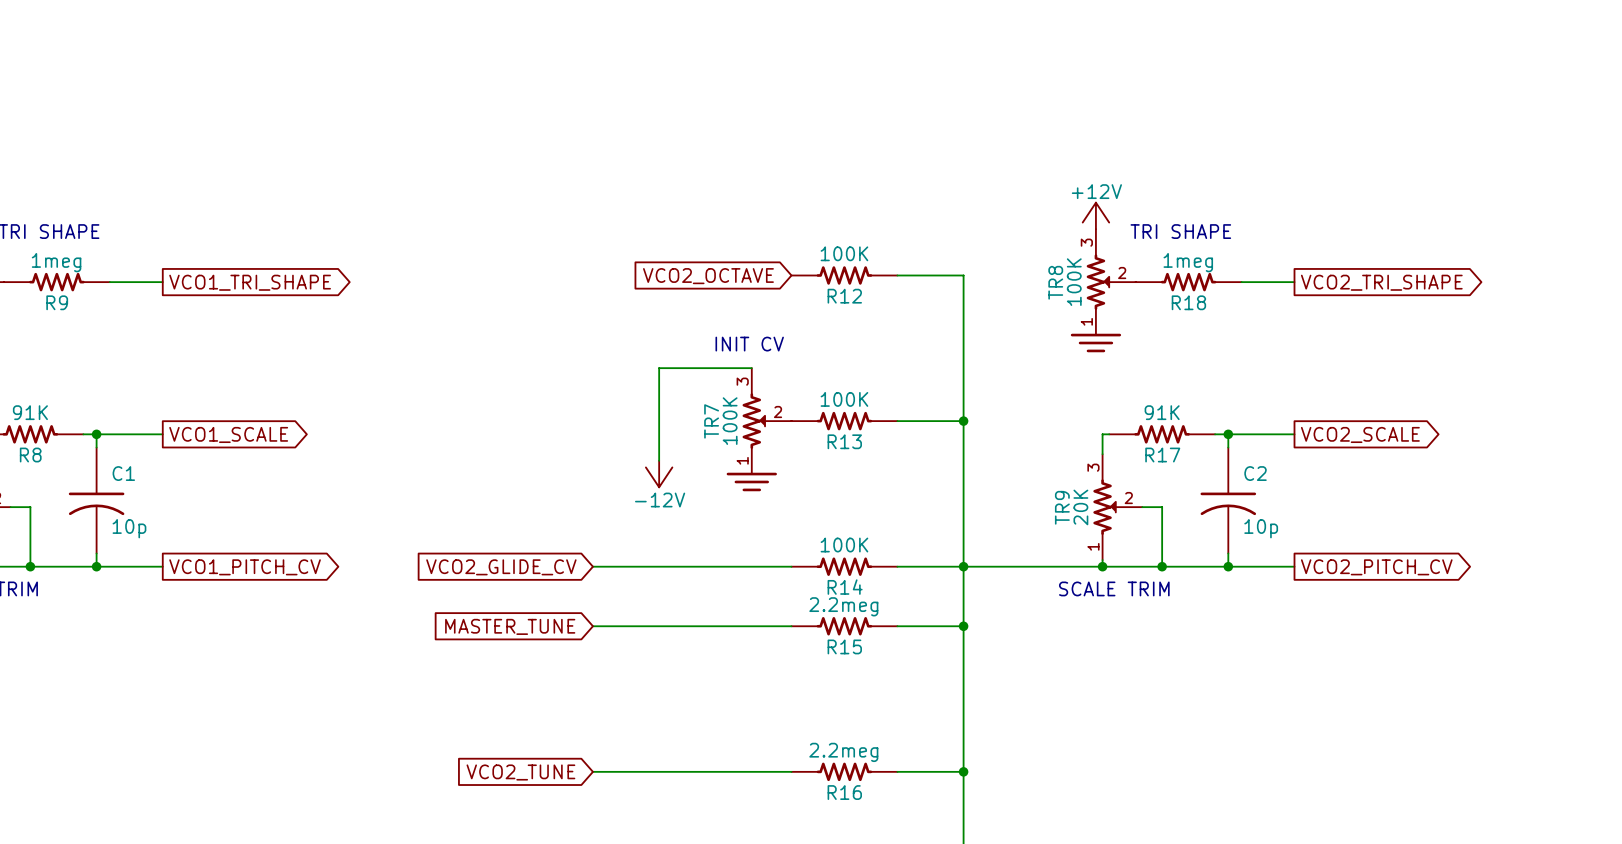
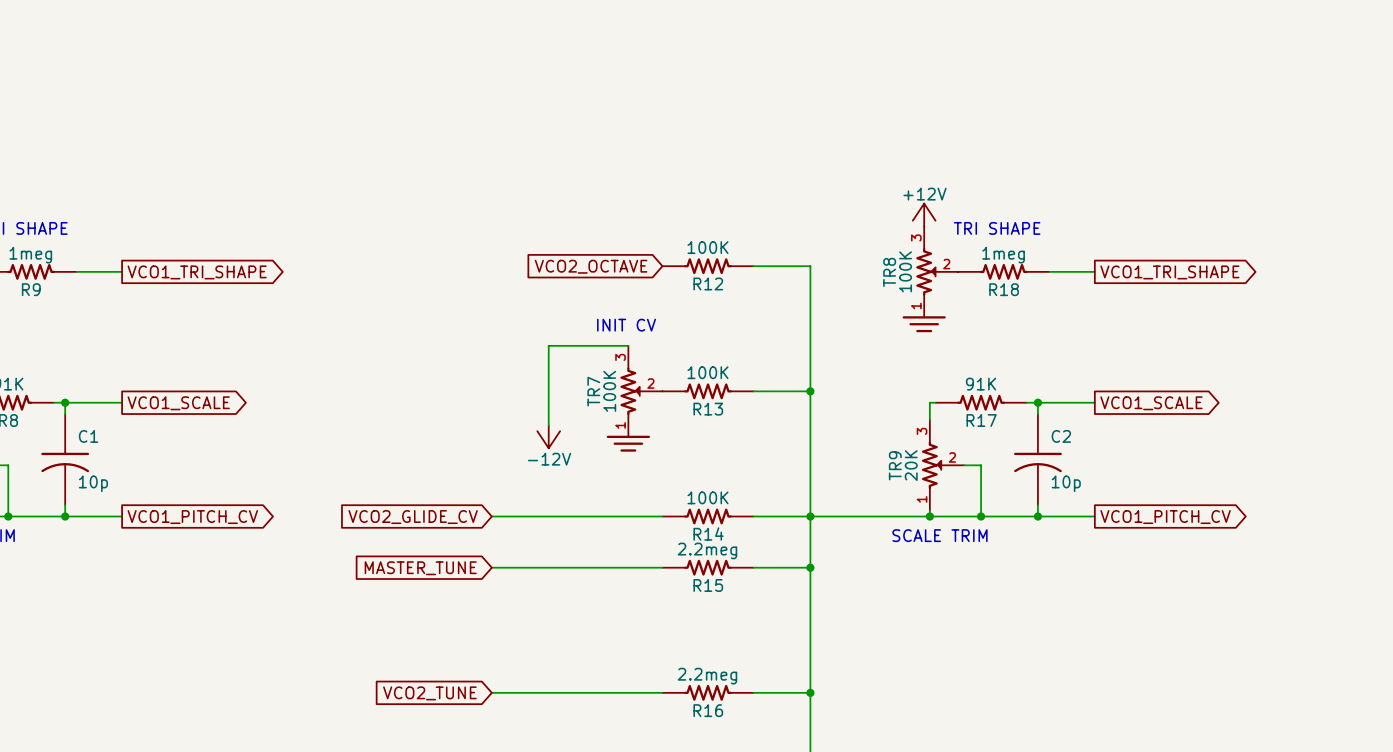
global label: VCO2_TRI_SHAPE (1381, 282) -> VCO1_TRI_SHAPE (1169, 272)
global label: VCO2_SCALE (1360, 434) -> VCO1_SCALE (1151, 403)
global label: VCO2_PITCH_CV (1376, 567) -> VCO1_PITCH_CV (1165, 517)

